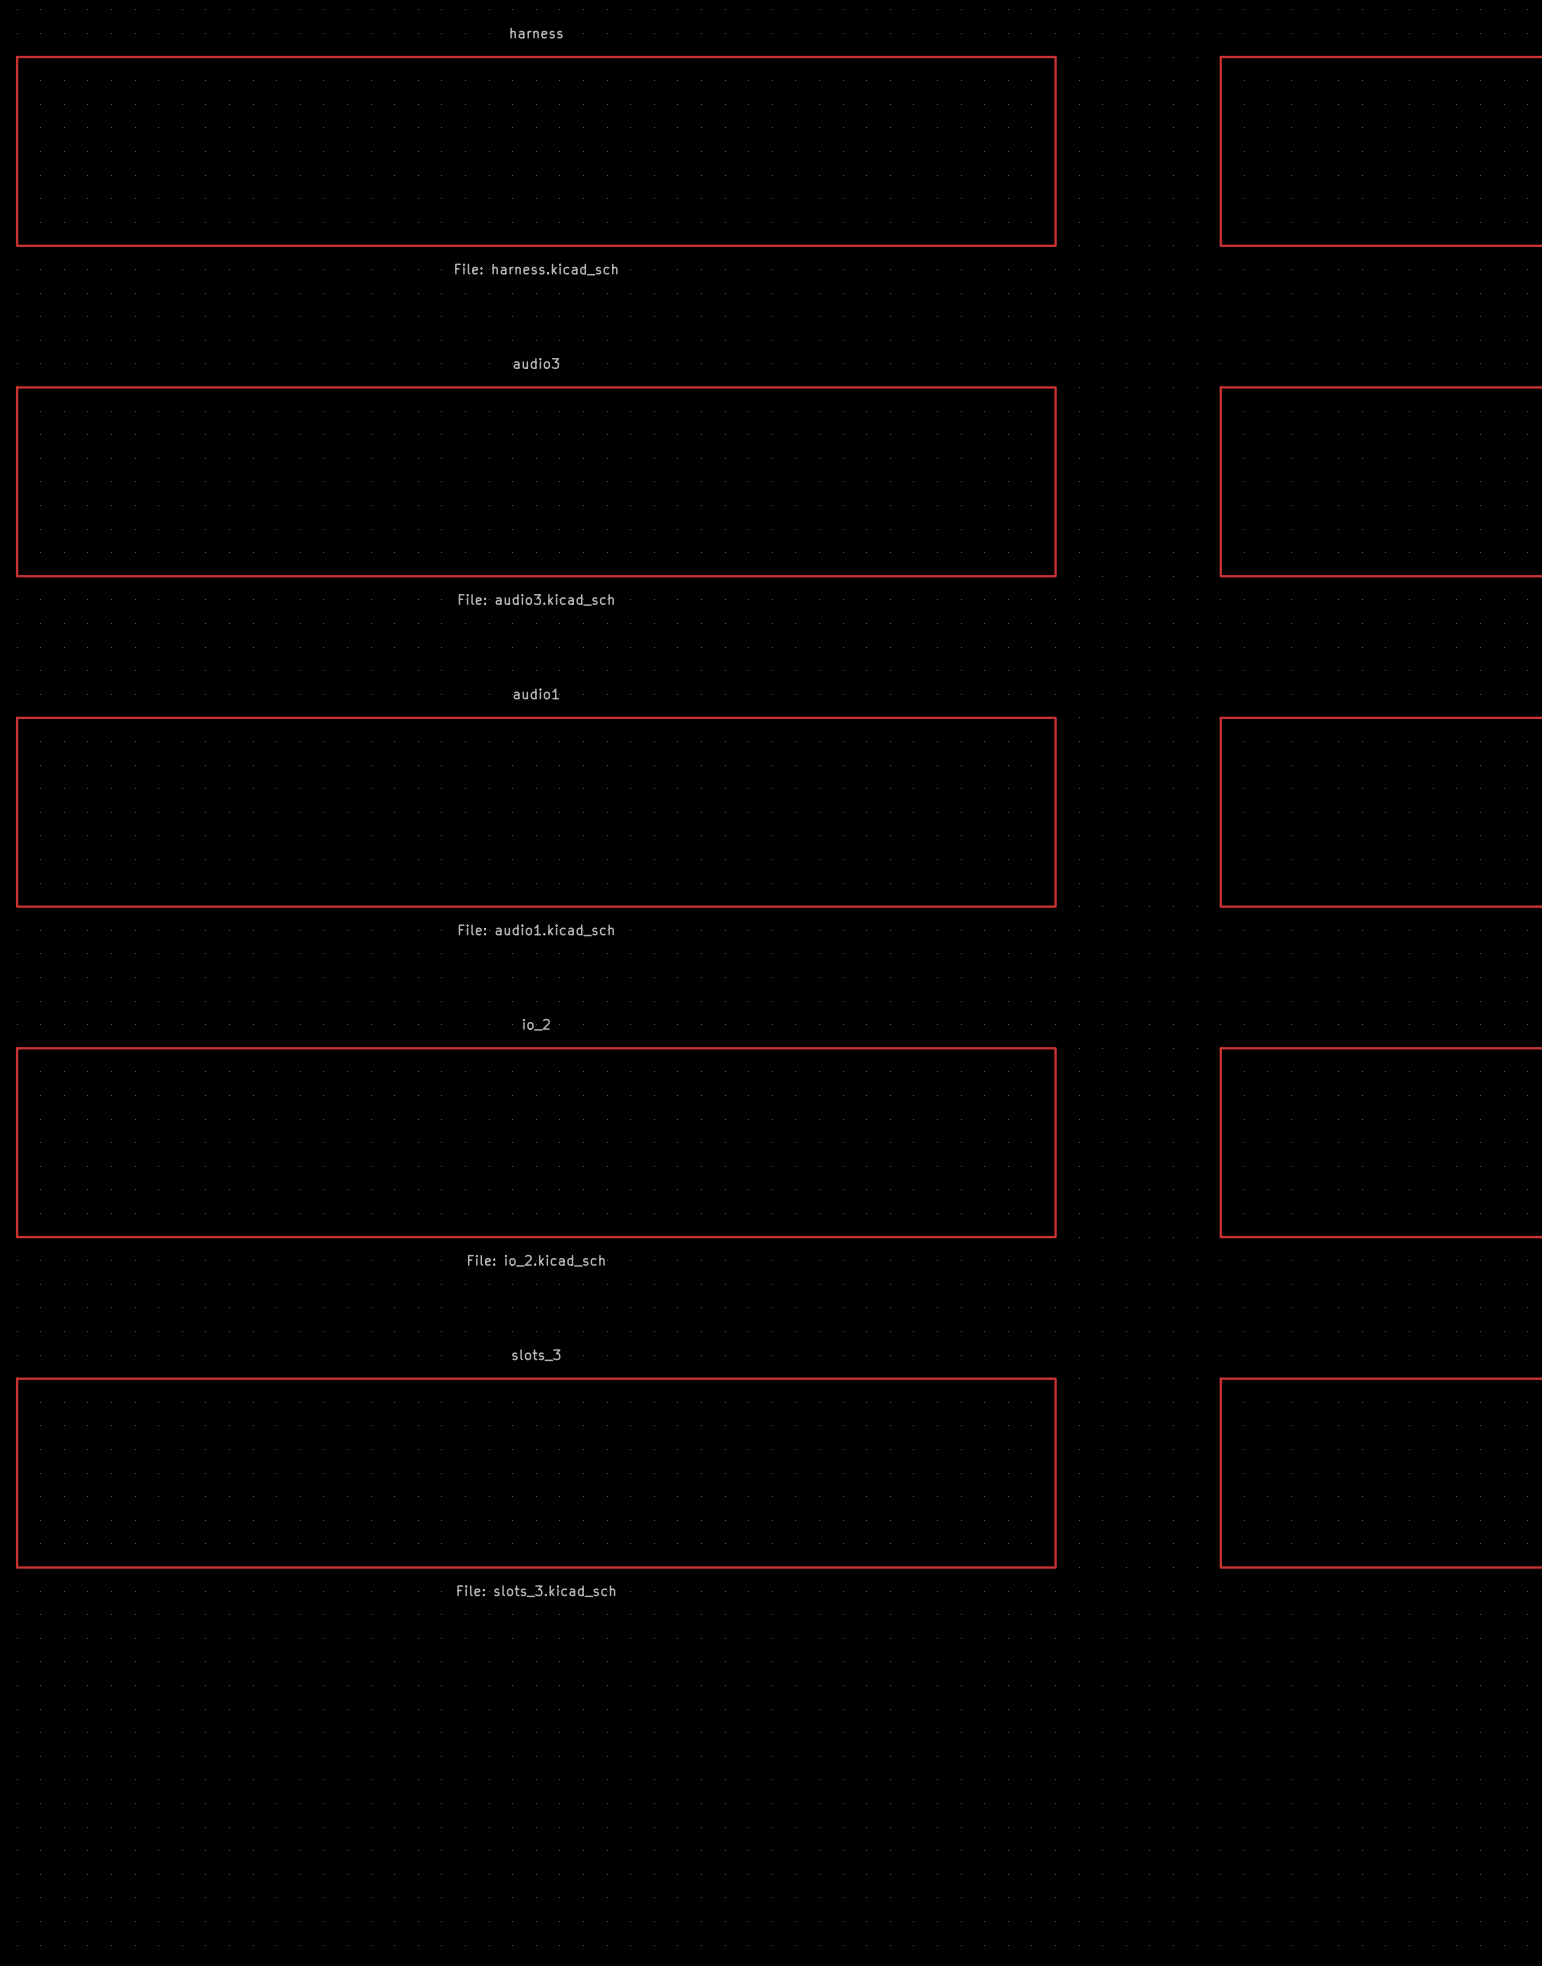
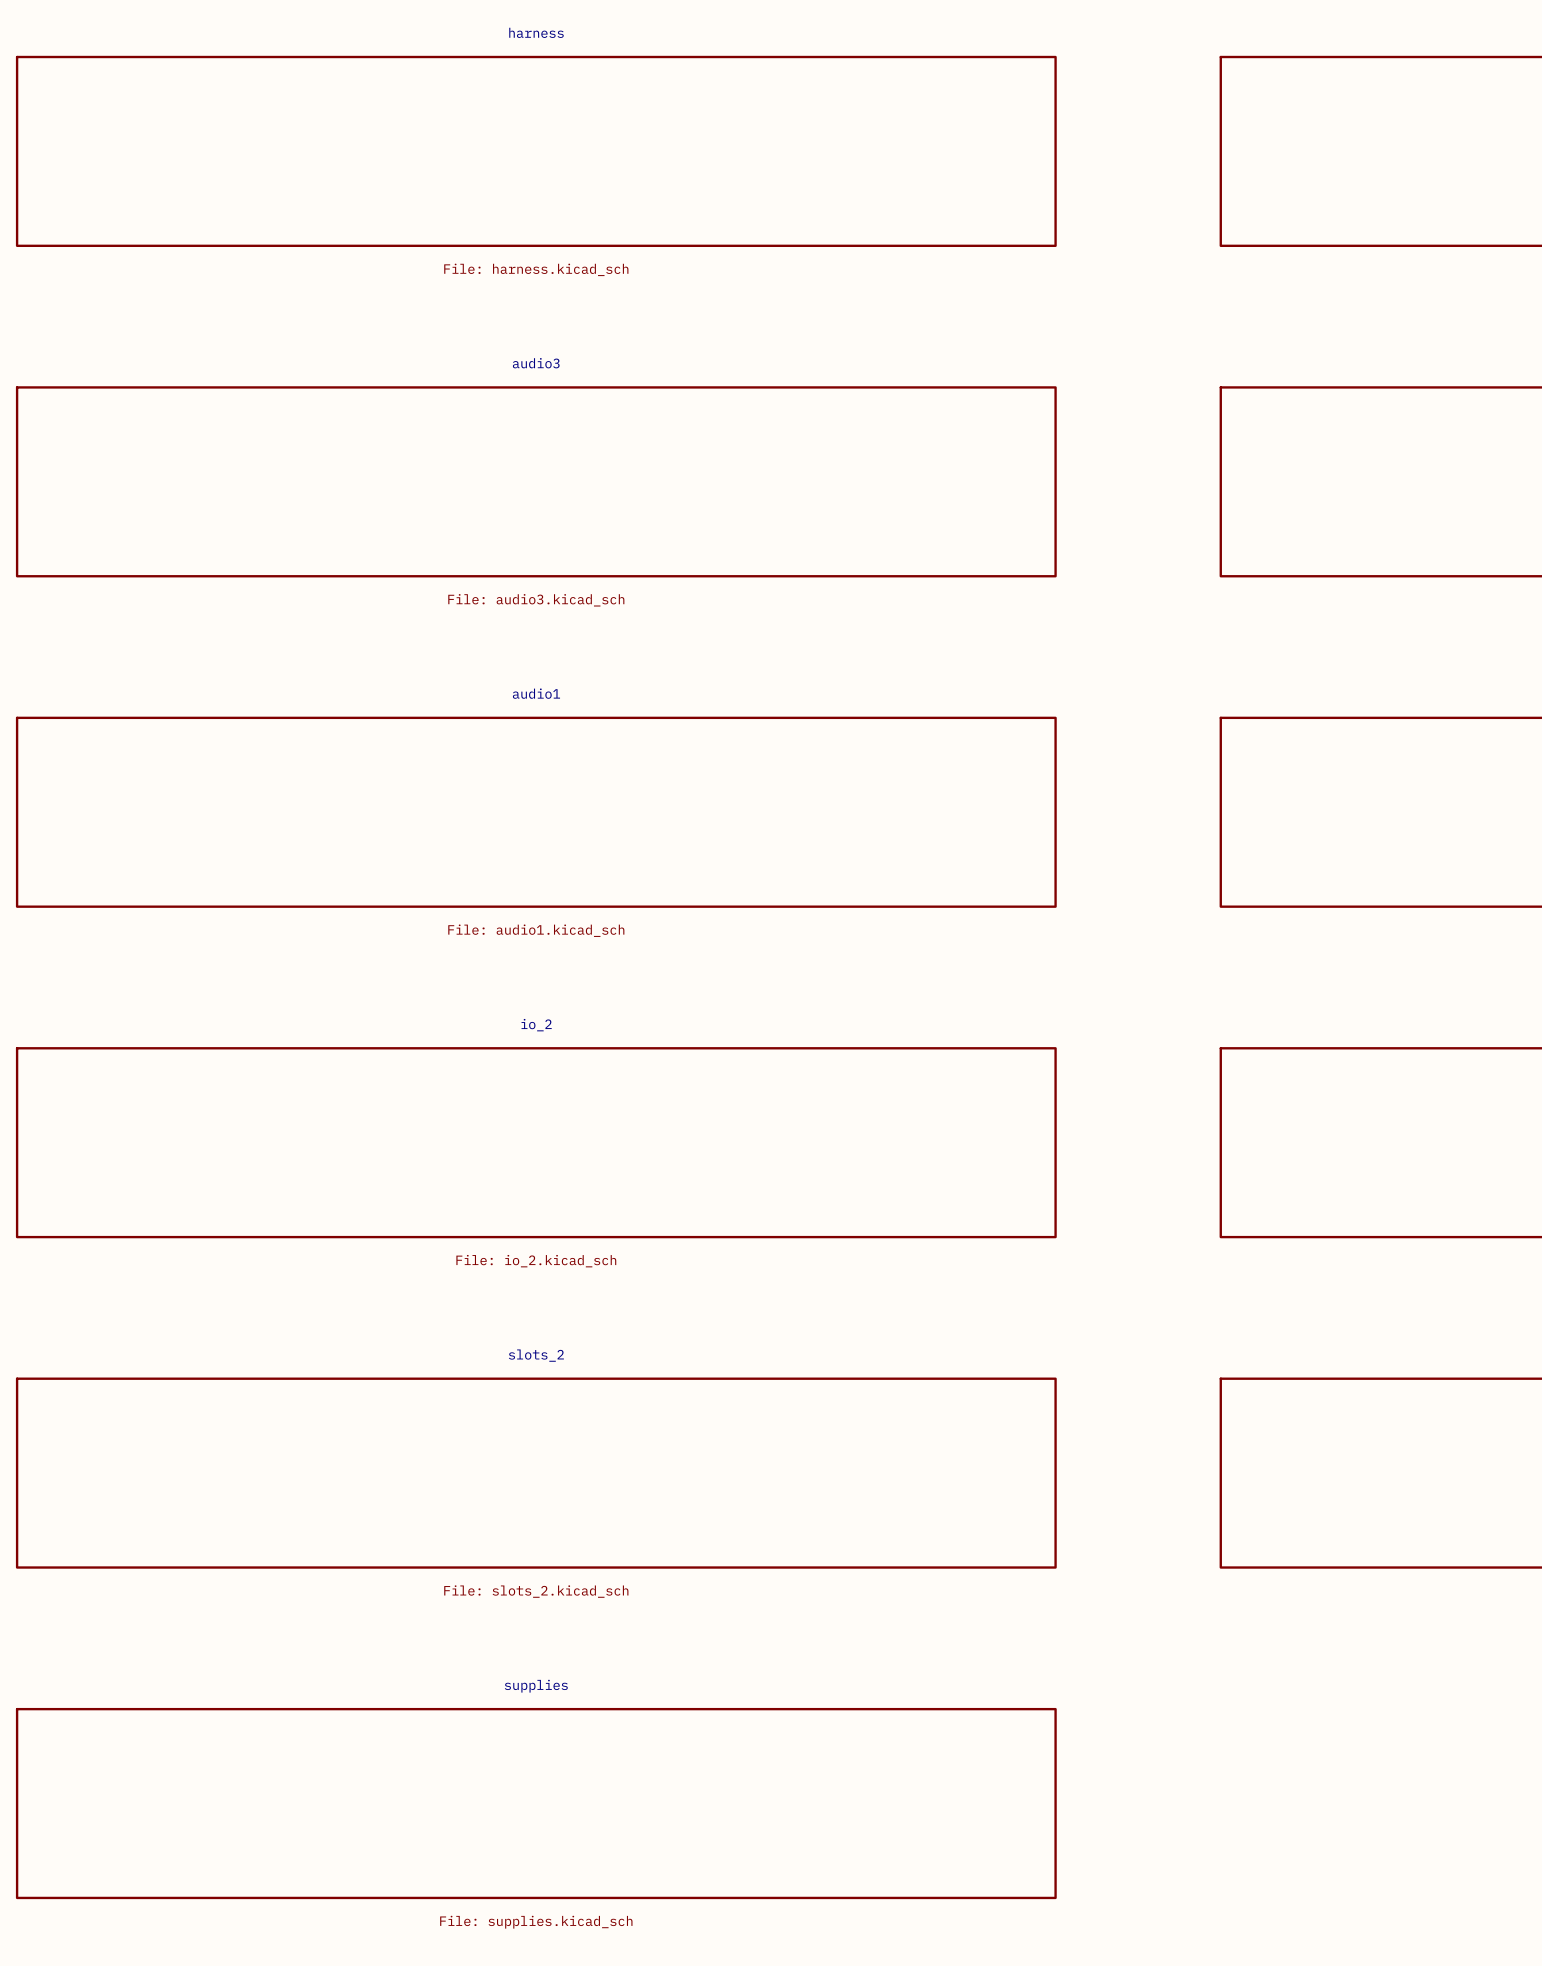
sheet slots_3 name: slots_3 (536, 1355) -> slots_2 (536, 1355)
sheet slots_3 value: File: slots_3.kicad_sch (536, 1591) -> File: slots_2.kicad_sch (536, 1591)
sheet supplies: none -> File: supplies.kicad_sch (536, 1803)

